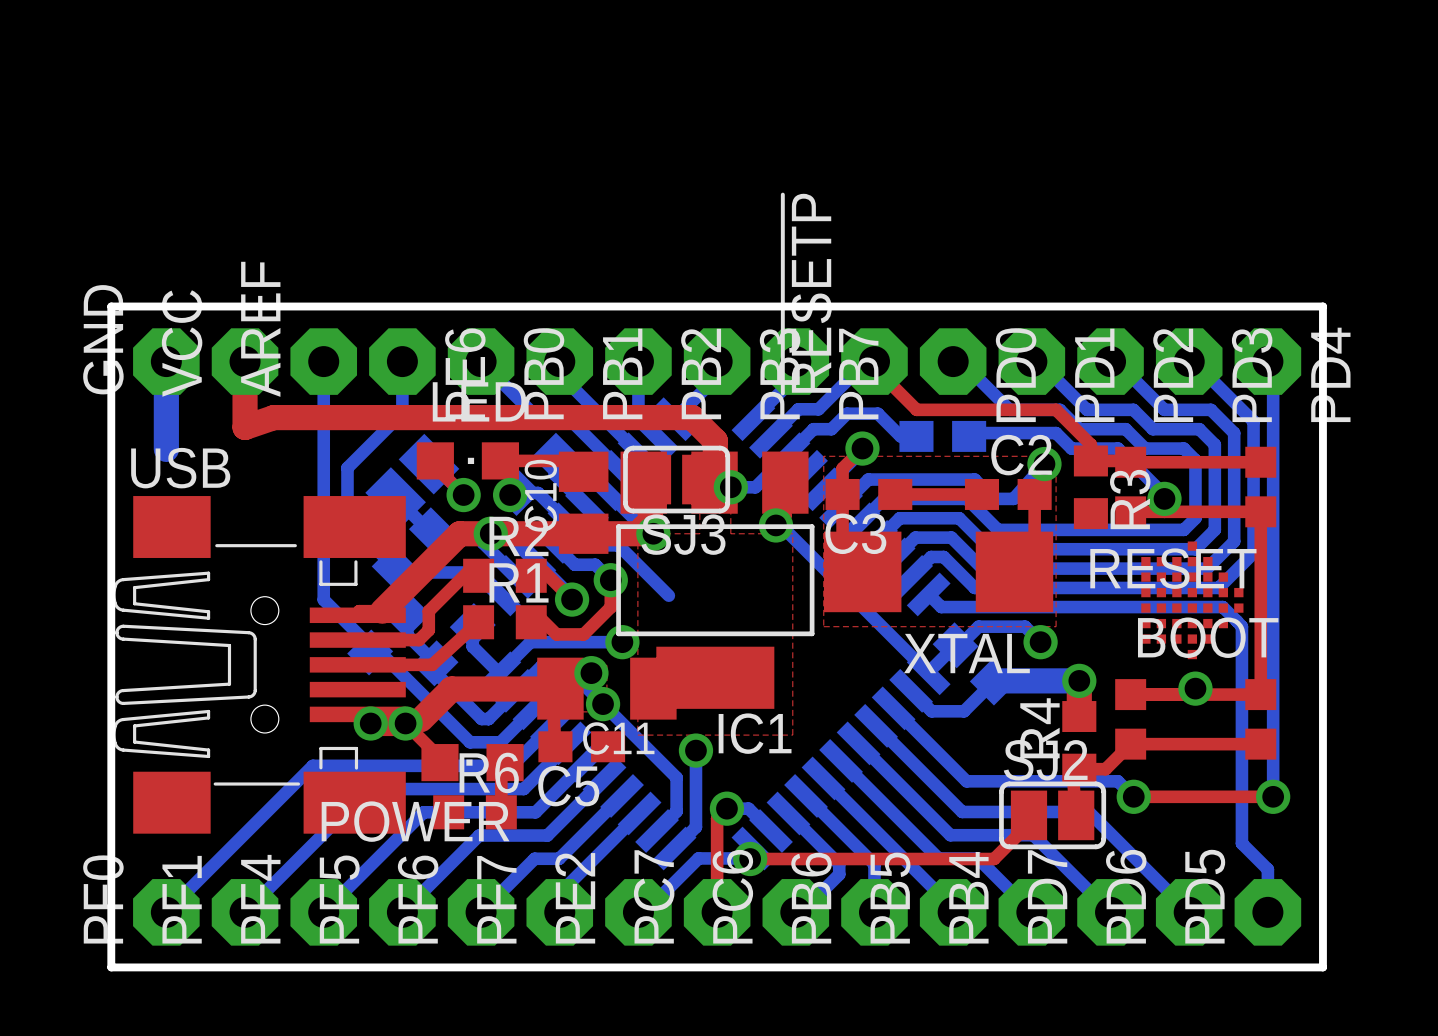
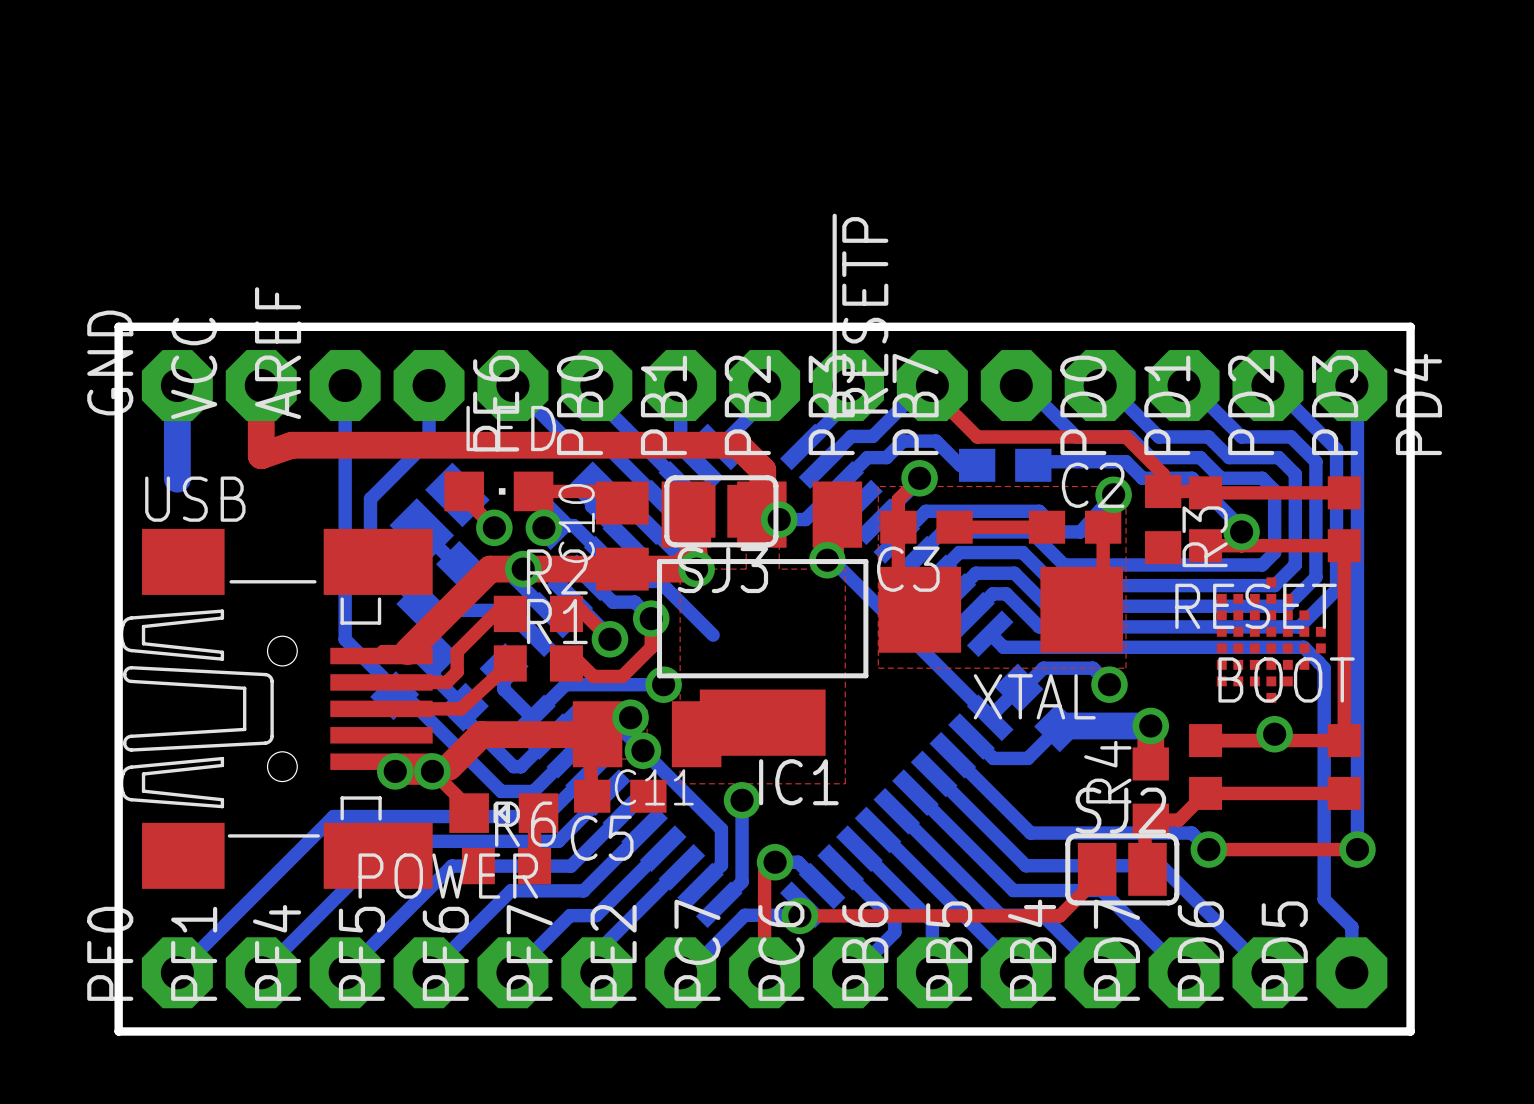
POWER footprint: [421, 744, 524, 782] -> [449, 793, 559, 833]

